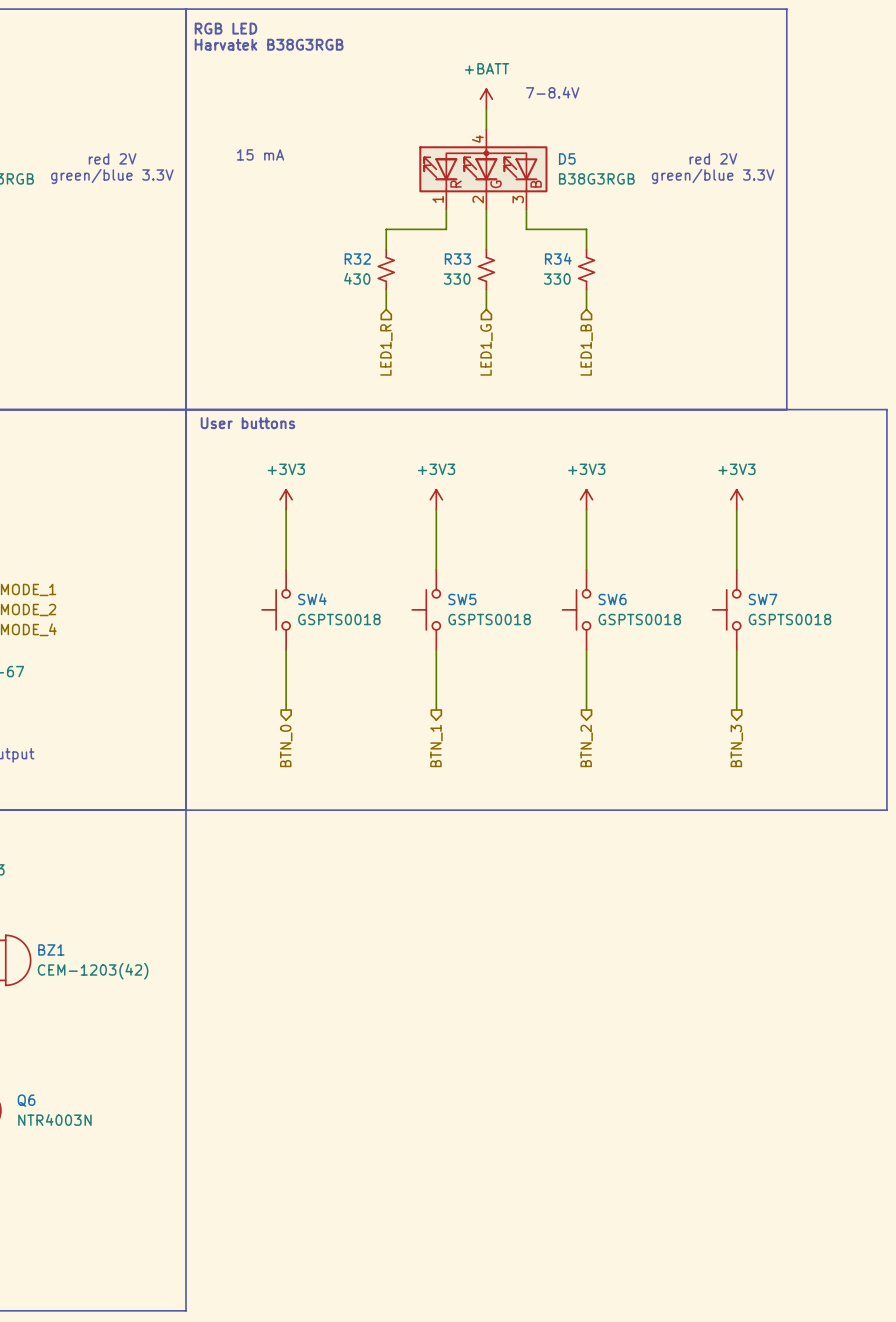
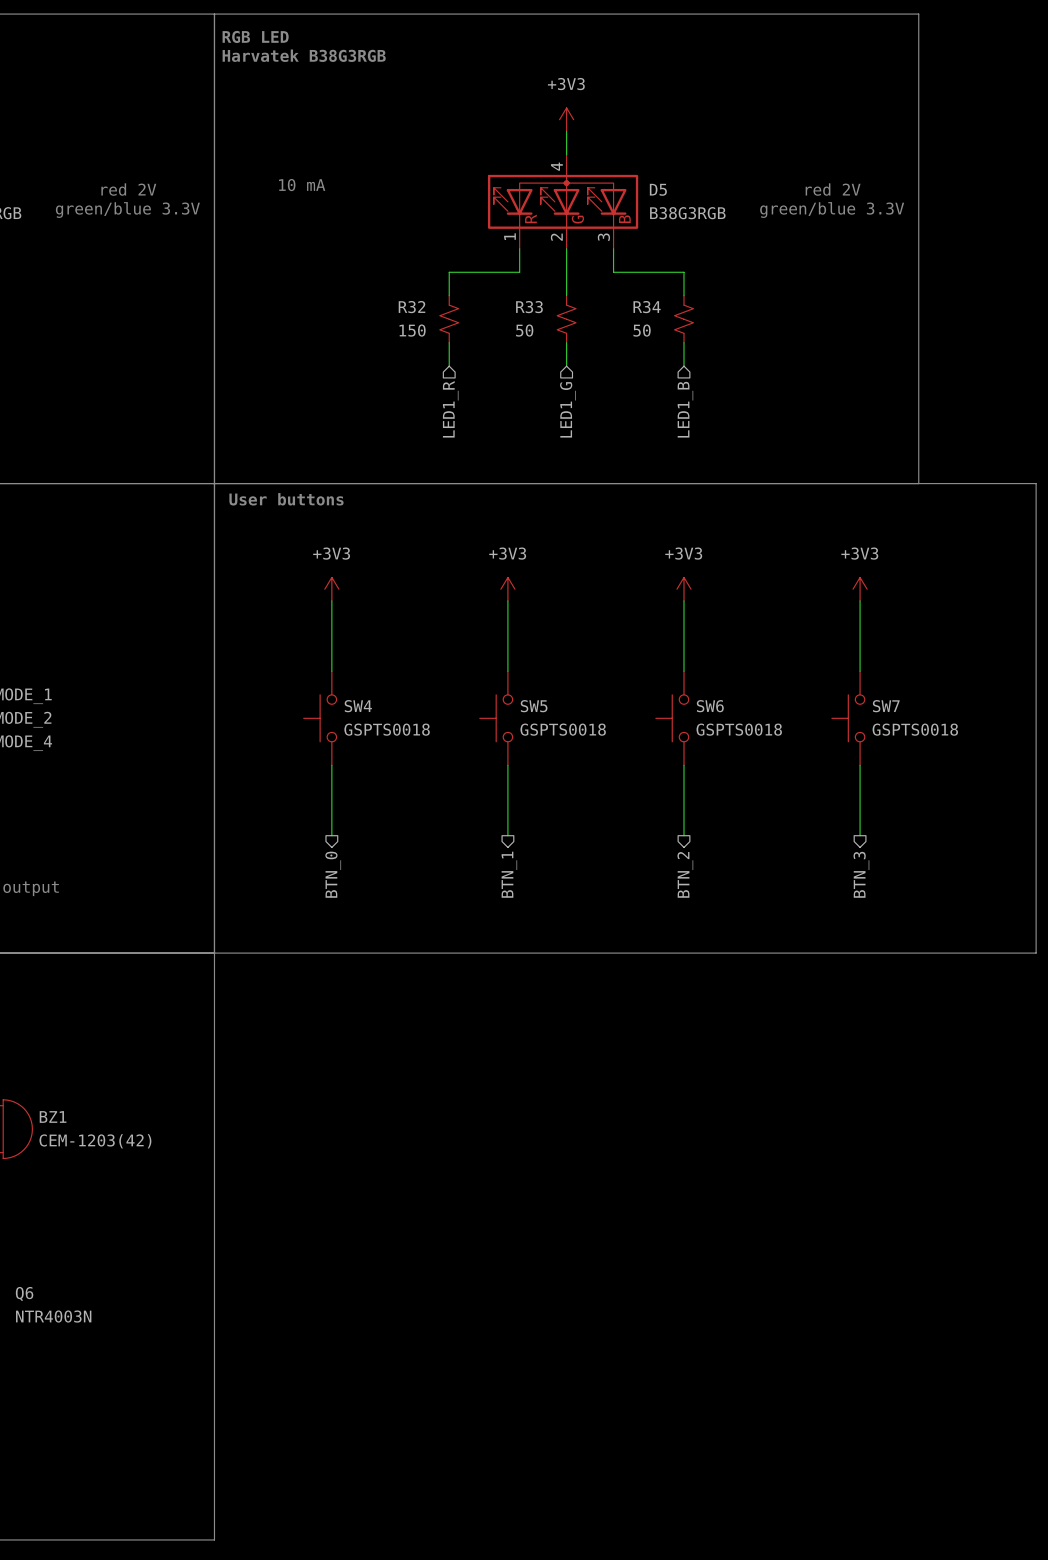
text: 7-8.4V (552, 92) -> none
power symbol: +BATT (486, 99) -> +3V3 (566, 119)
text: 15 mA (260, 154) -> 10 mA (302, 185)
R32 value: 430 (357, 278) -> 150 (412, 330)
R33 value: 330 (457, 279) -> 50 (524, 330)
R34 value: 330 (557, 279) -> 50 (642, 330)

